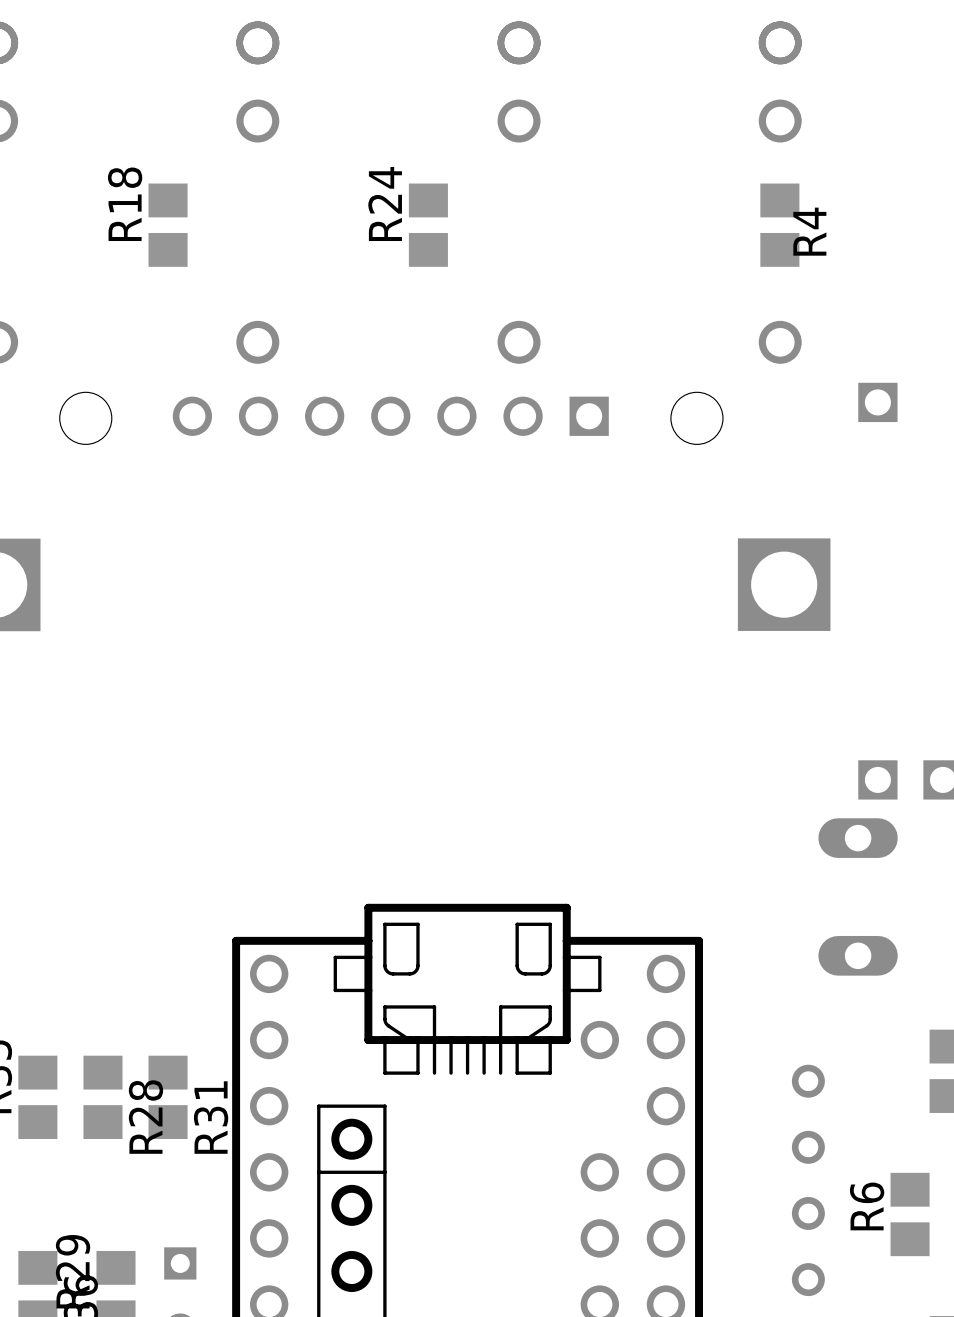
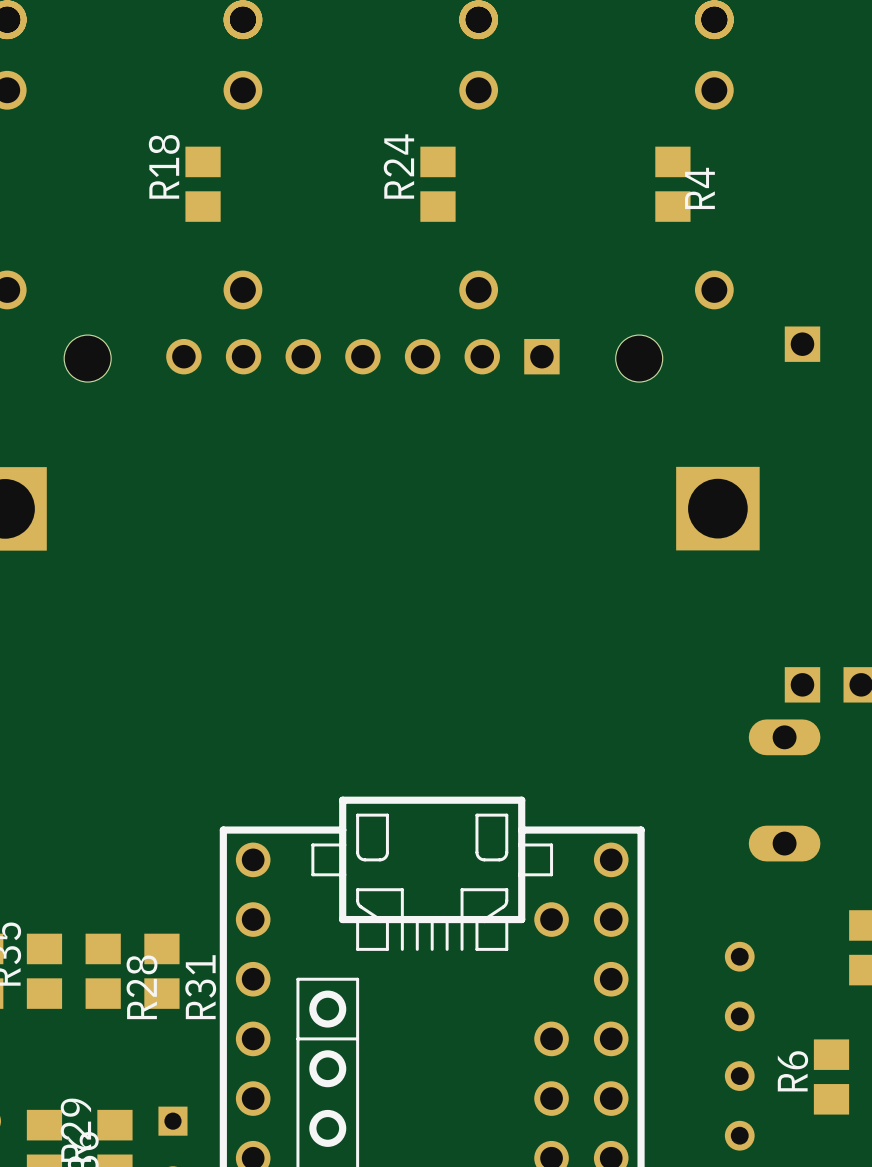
R18 position: (168, 225) -> (203, 184)
R24 position: (428, 225) -> (437, 184)
R4 position: (779, 225) -> (672, 184)

